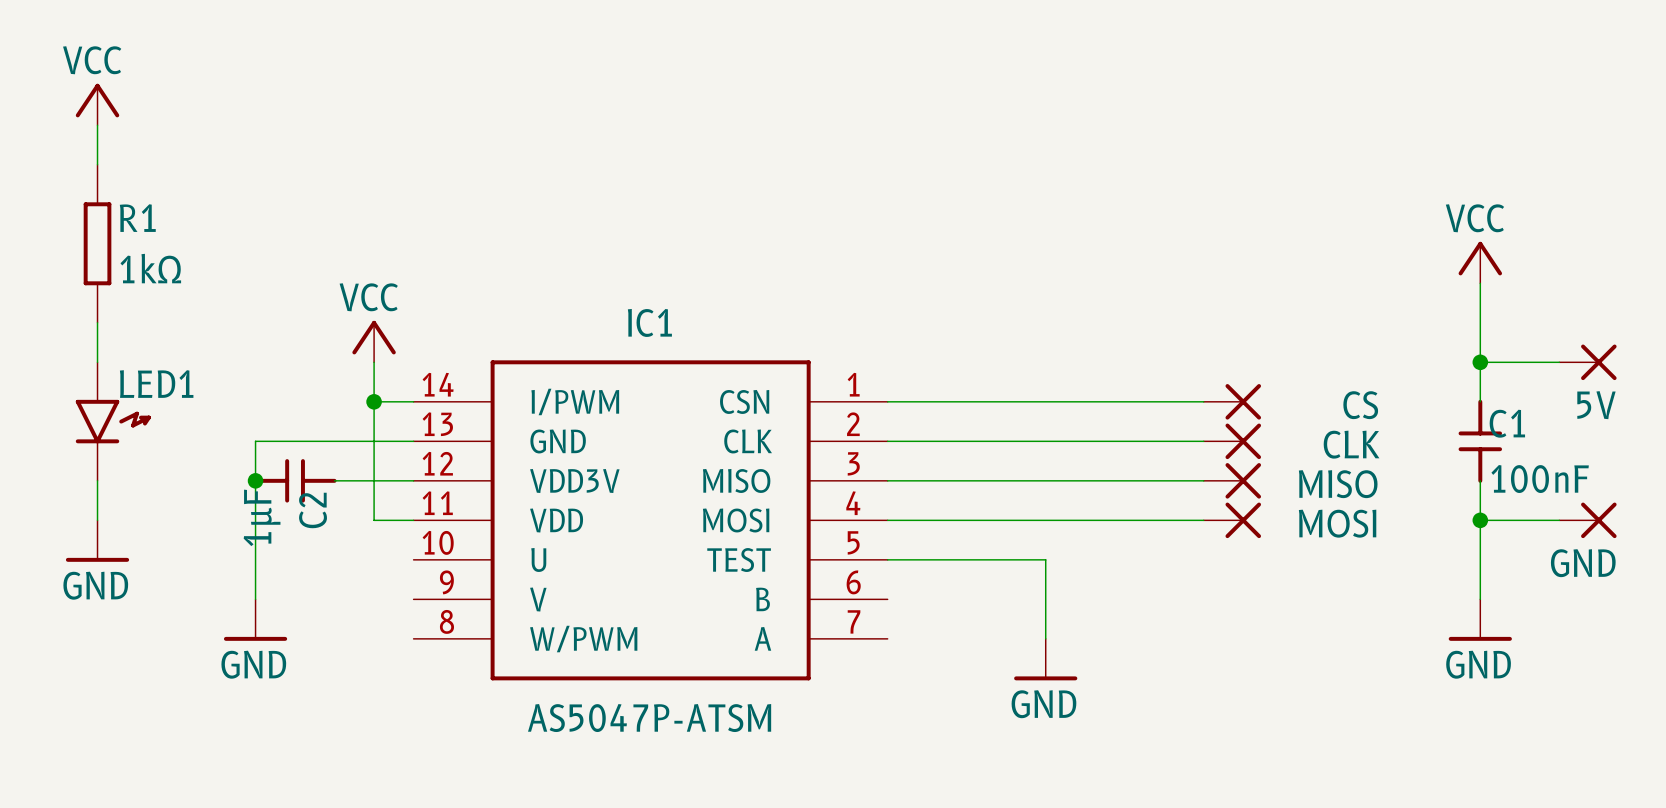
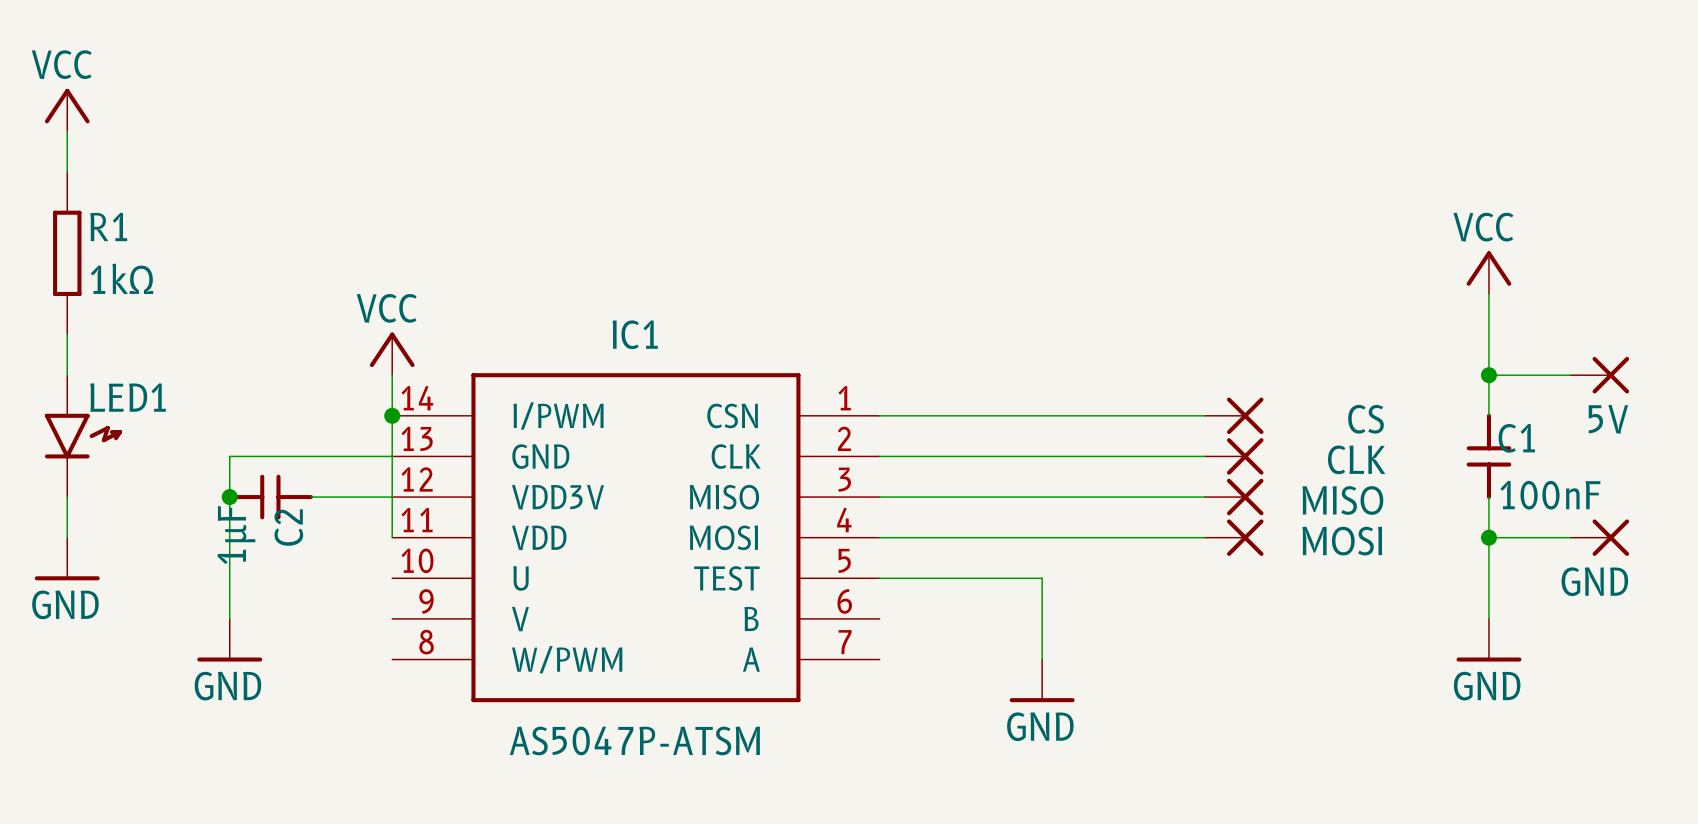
power symbol position: VCC (374, 341) -> VCC (392, 353)
wire: (374, 362) (374, 520) (413, 520) -> (392, 375) (392, 537)
wire: (374, 401) (413, 401) -> none
junction position: (374, 401) -> (392, 415)

